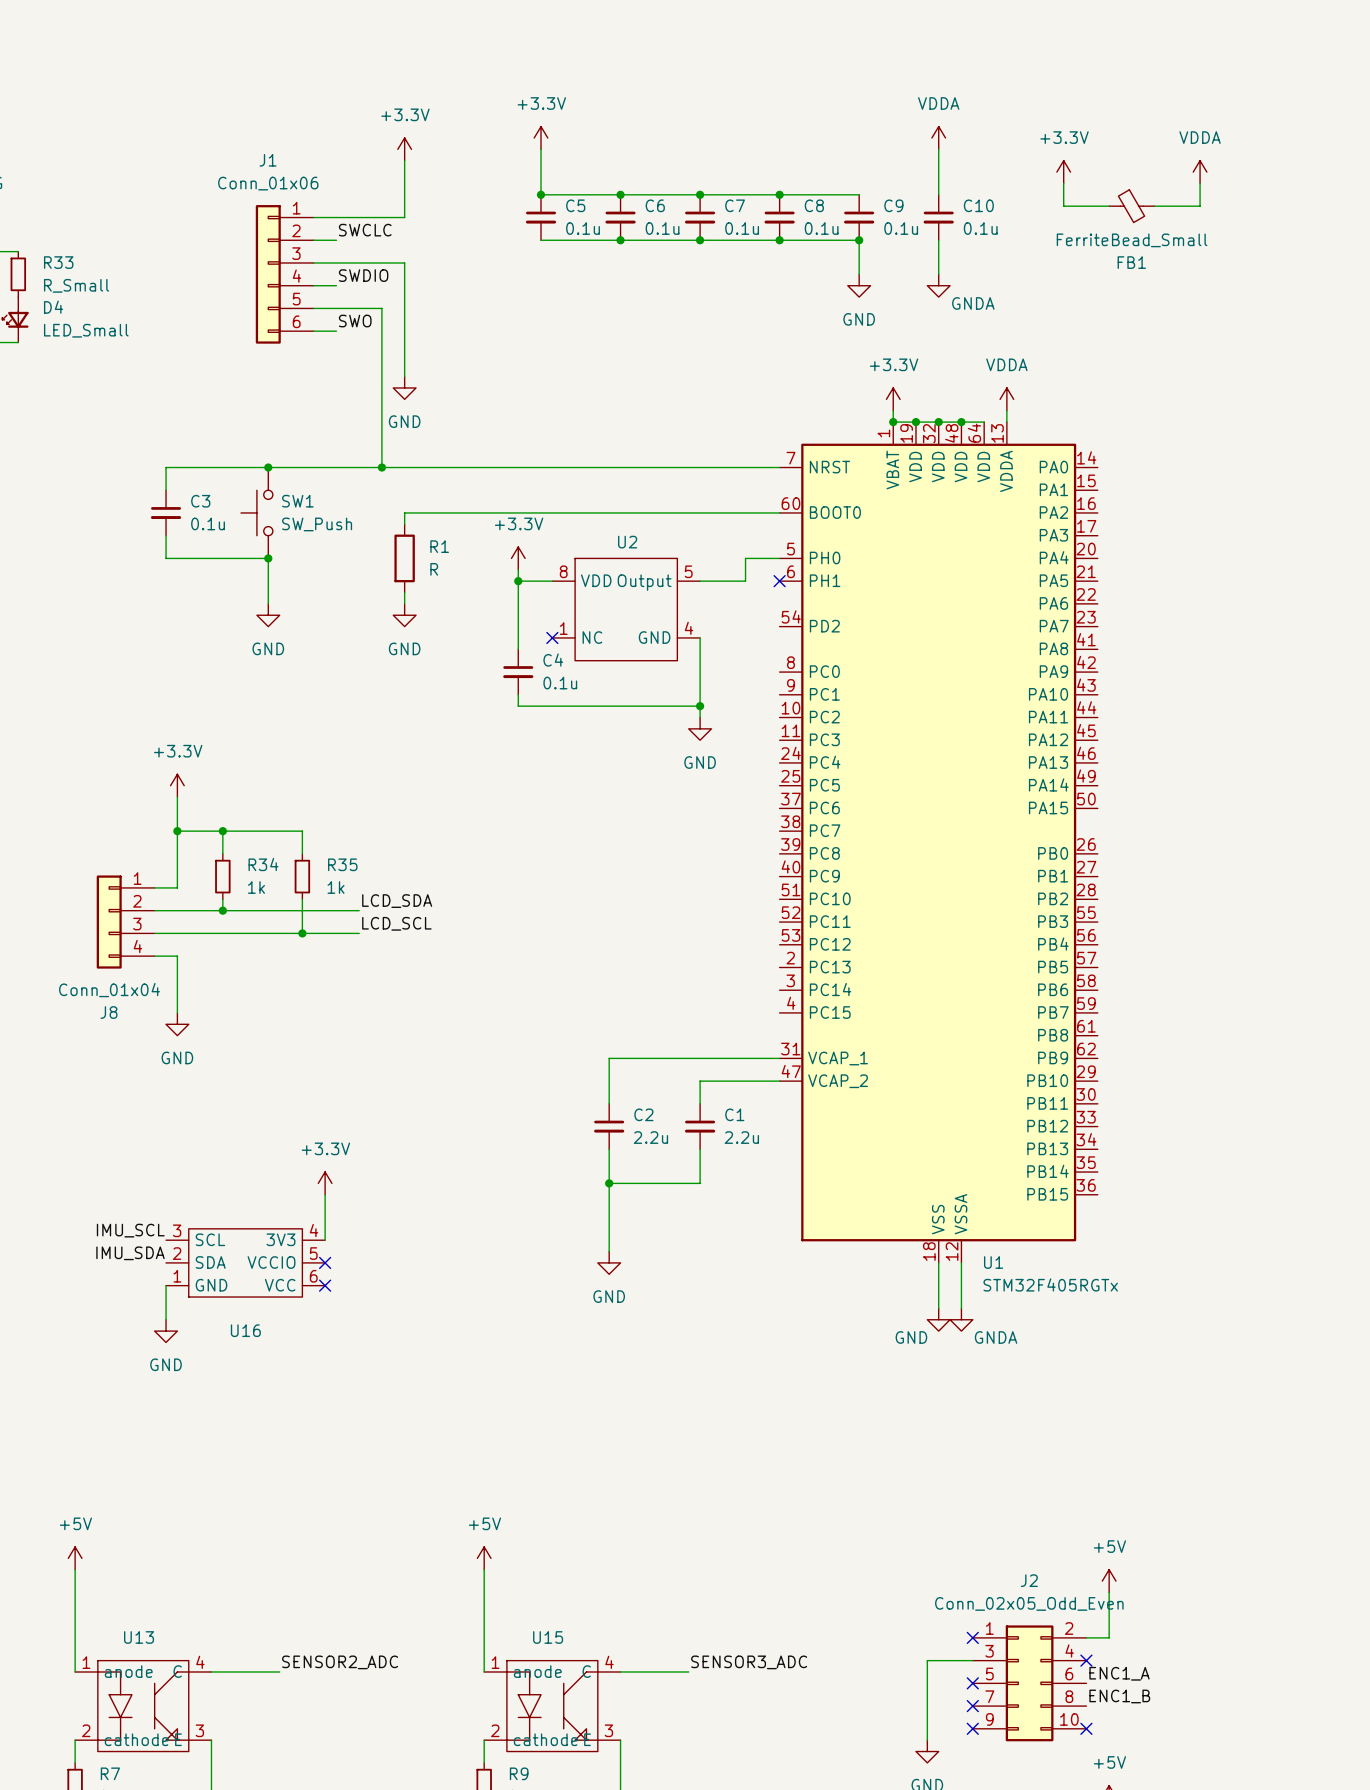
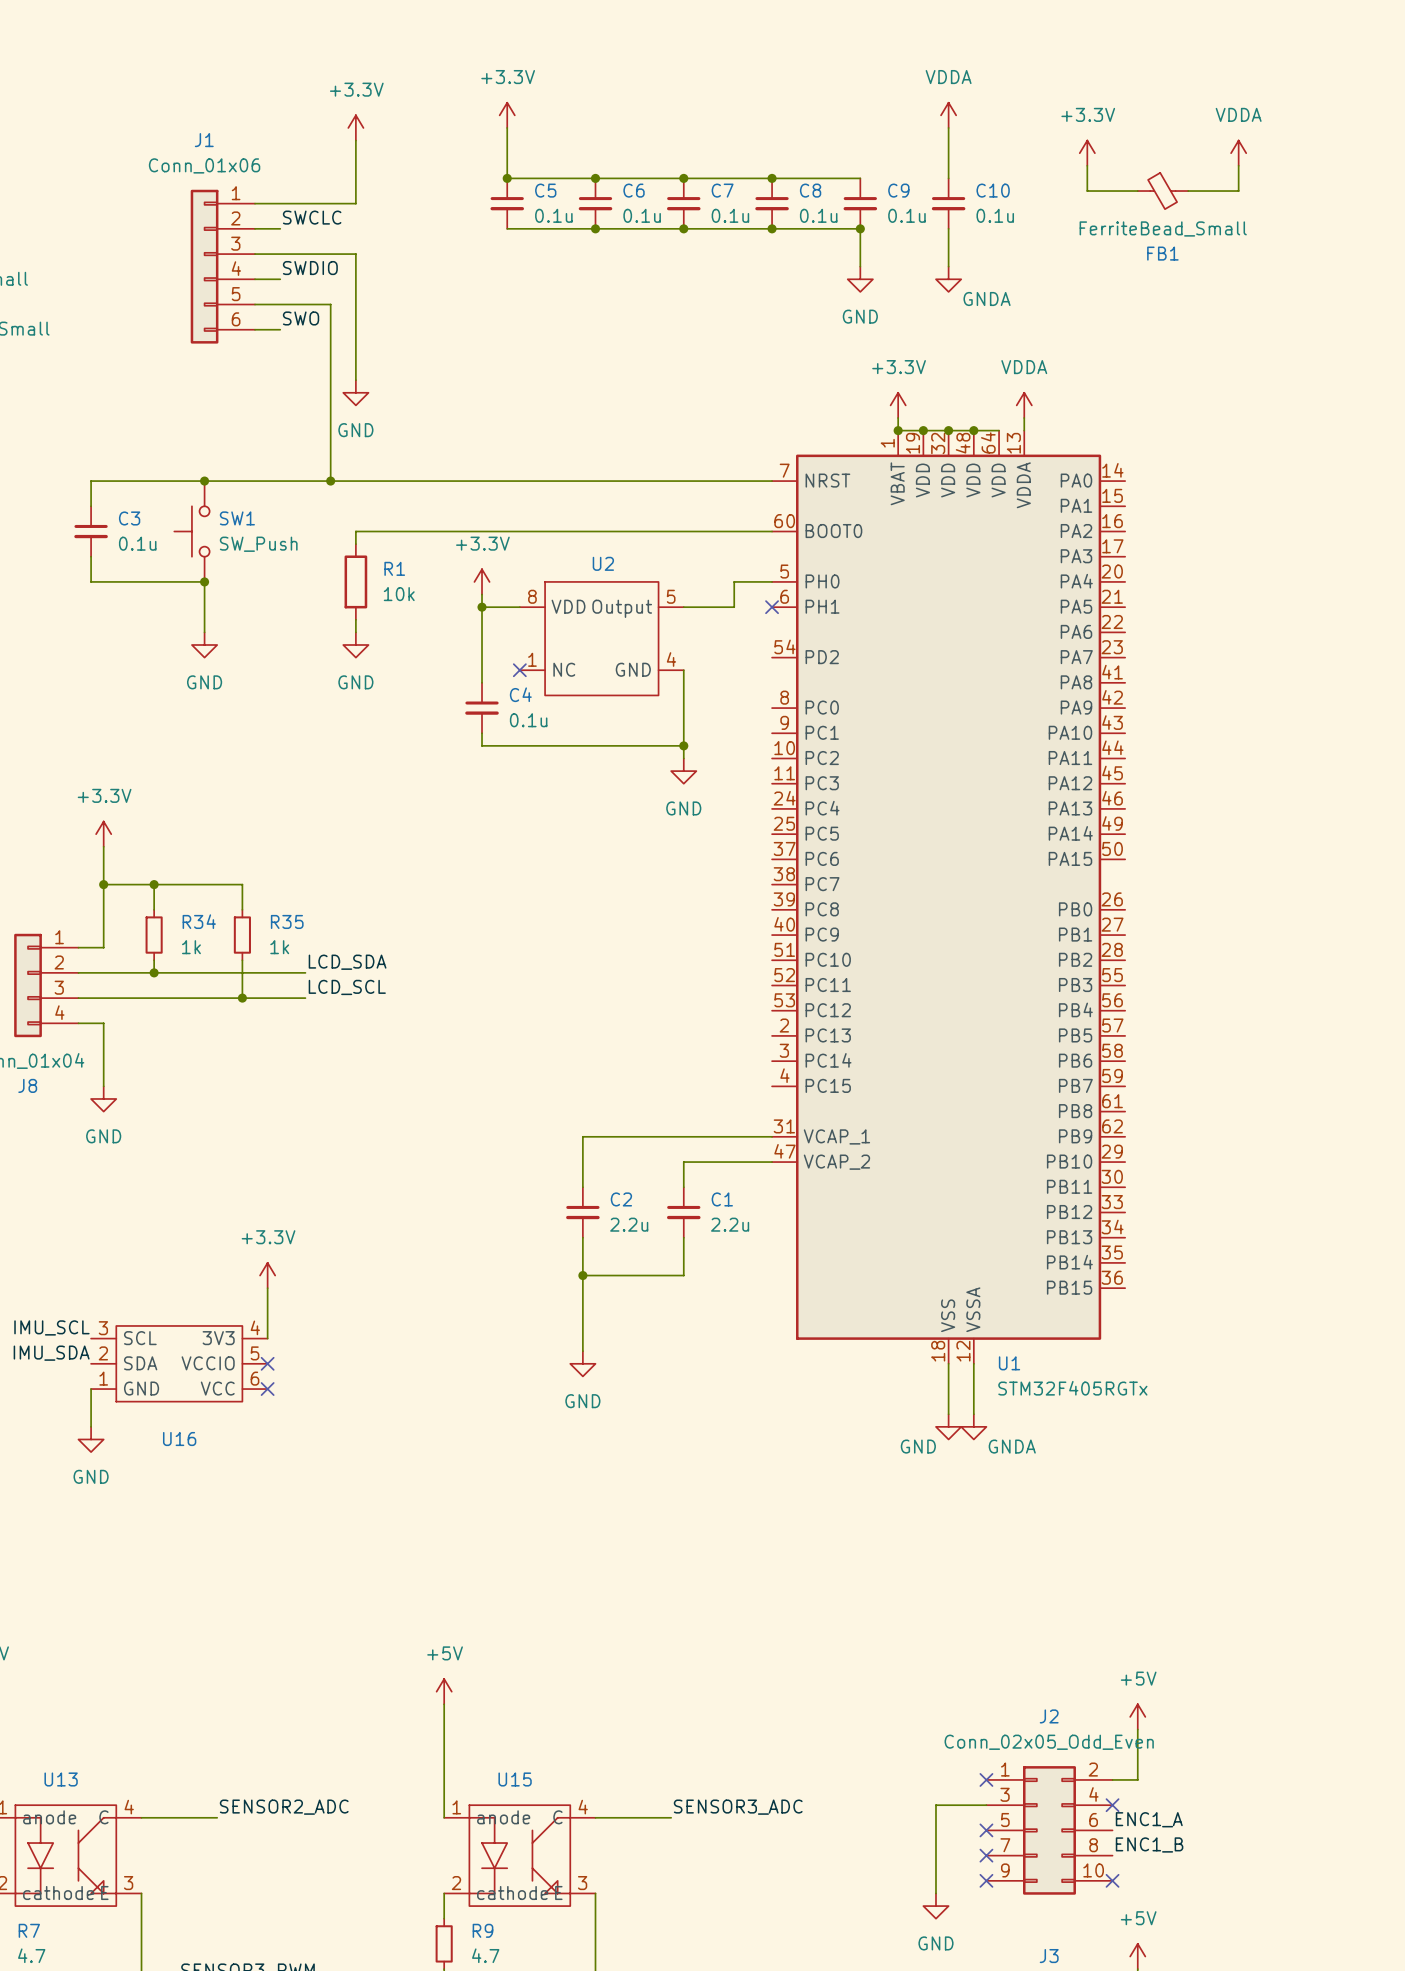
R1 value: R (434, 569) -> 10k (399, 594)

